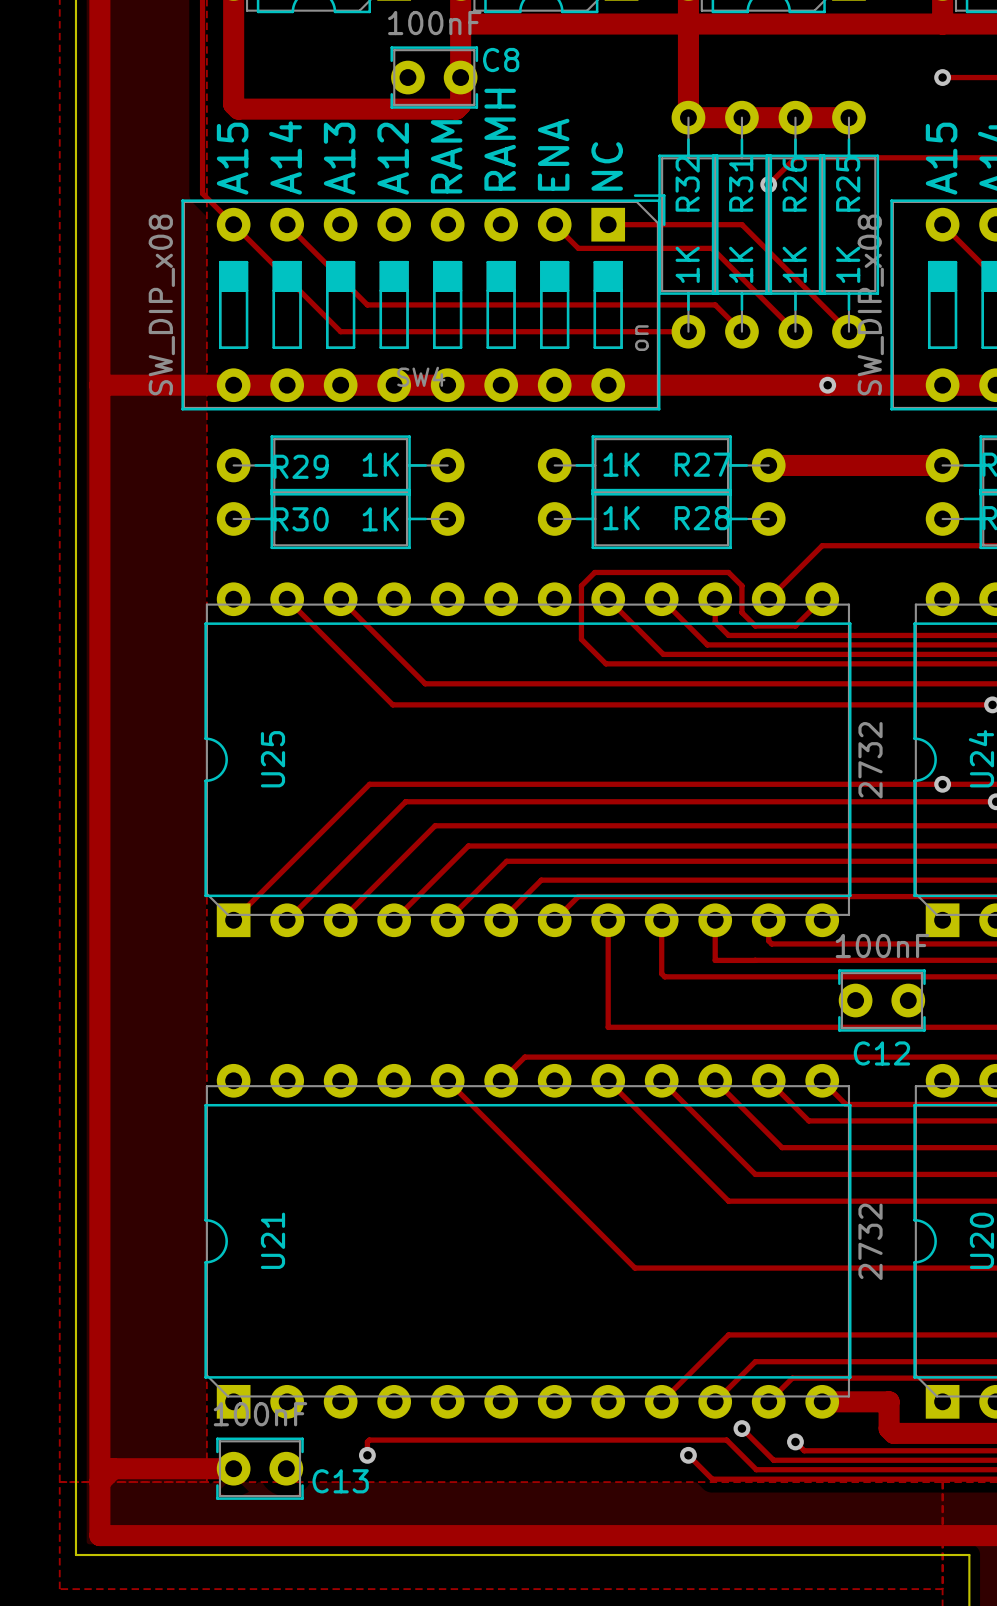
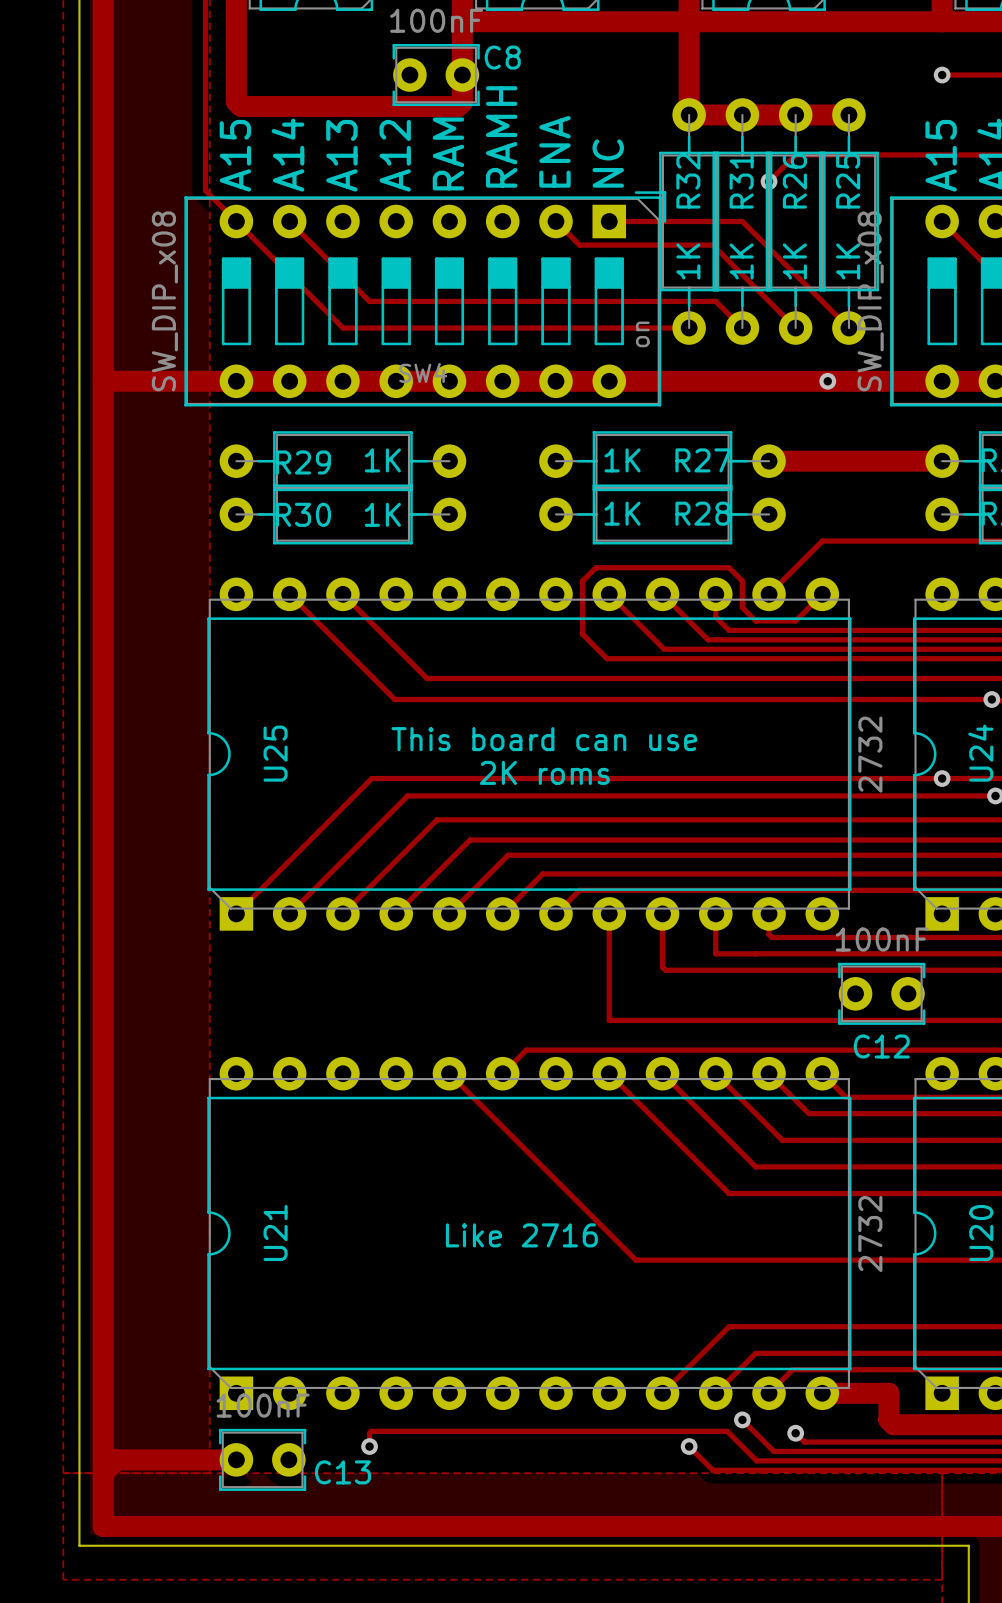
text: none -> This board can use (544, 739)
text: none -> 2K roms (544, 772)
text: none -> Like 2716 (521, 1235)

